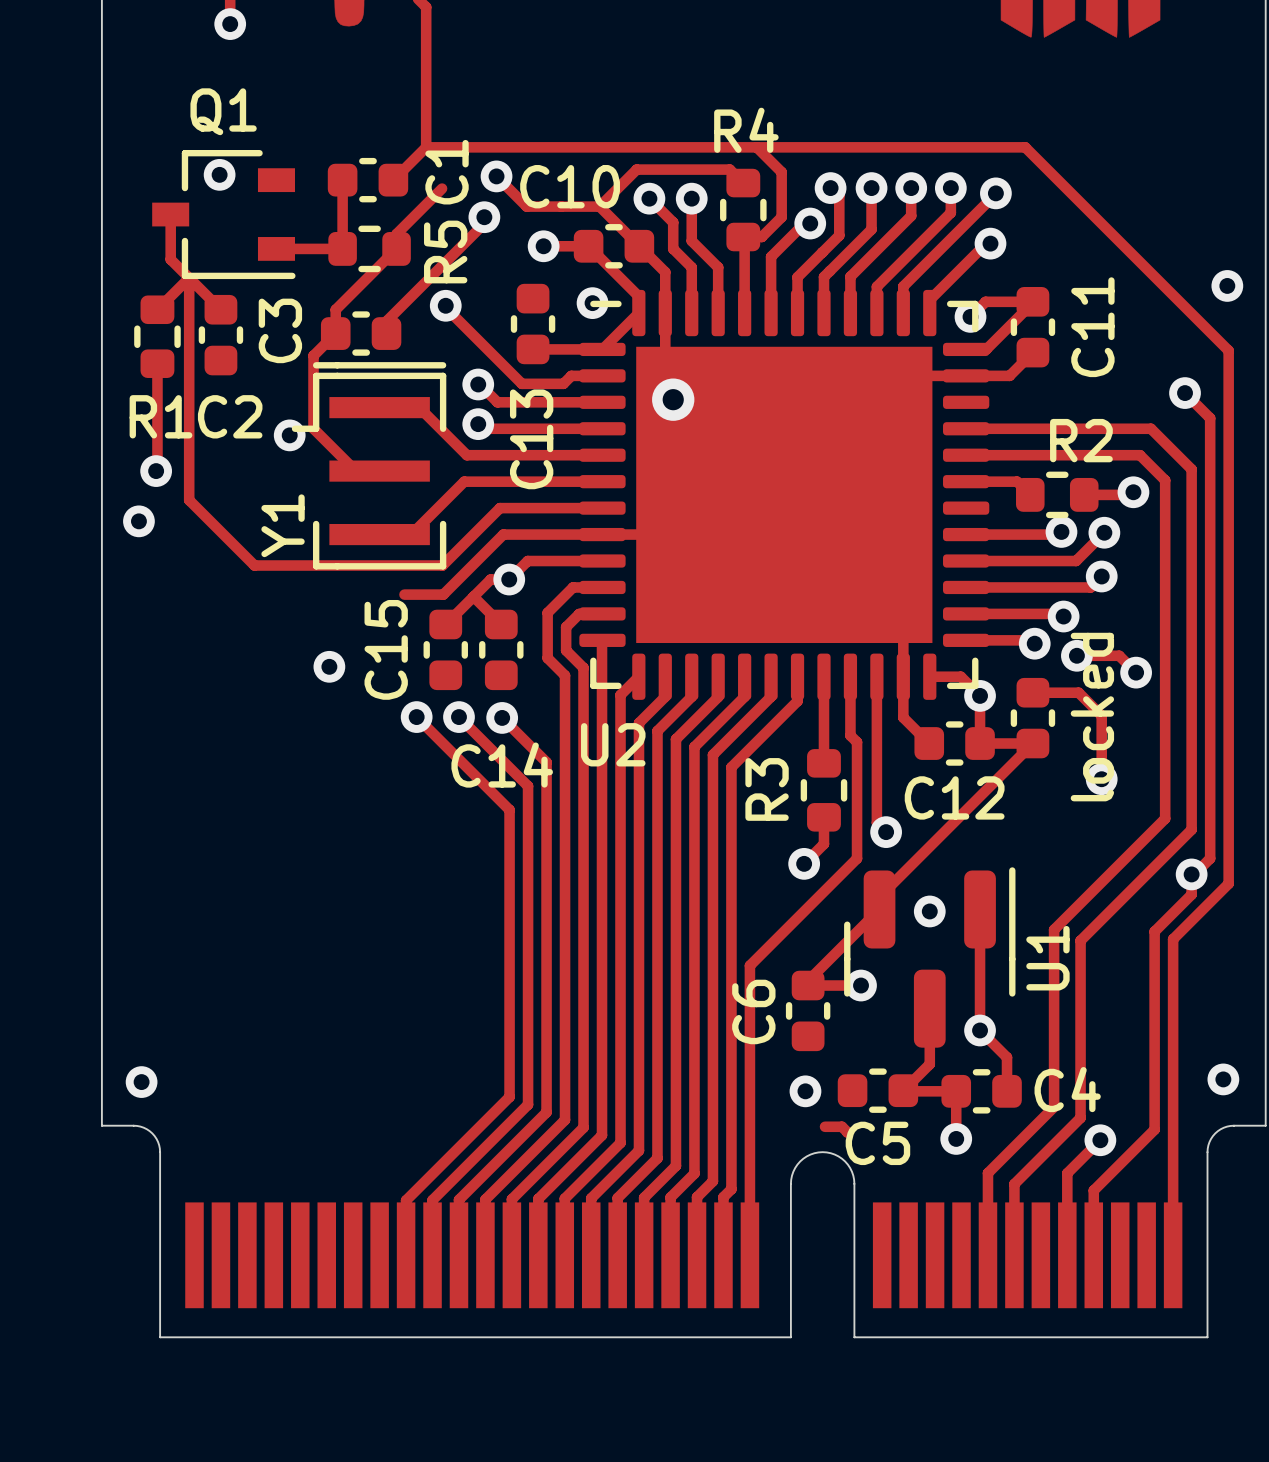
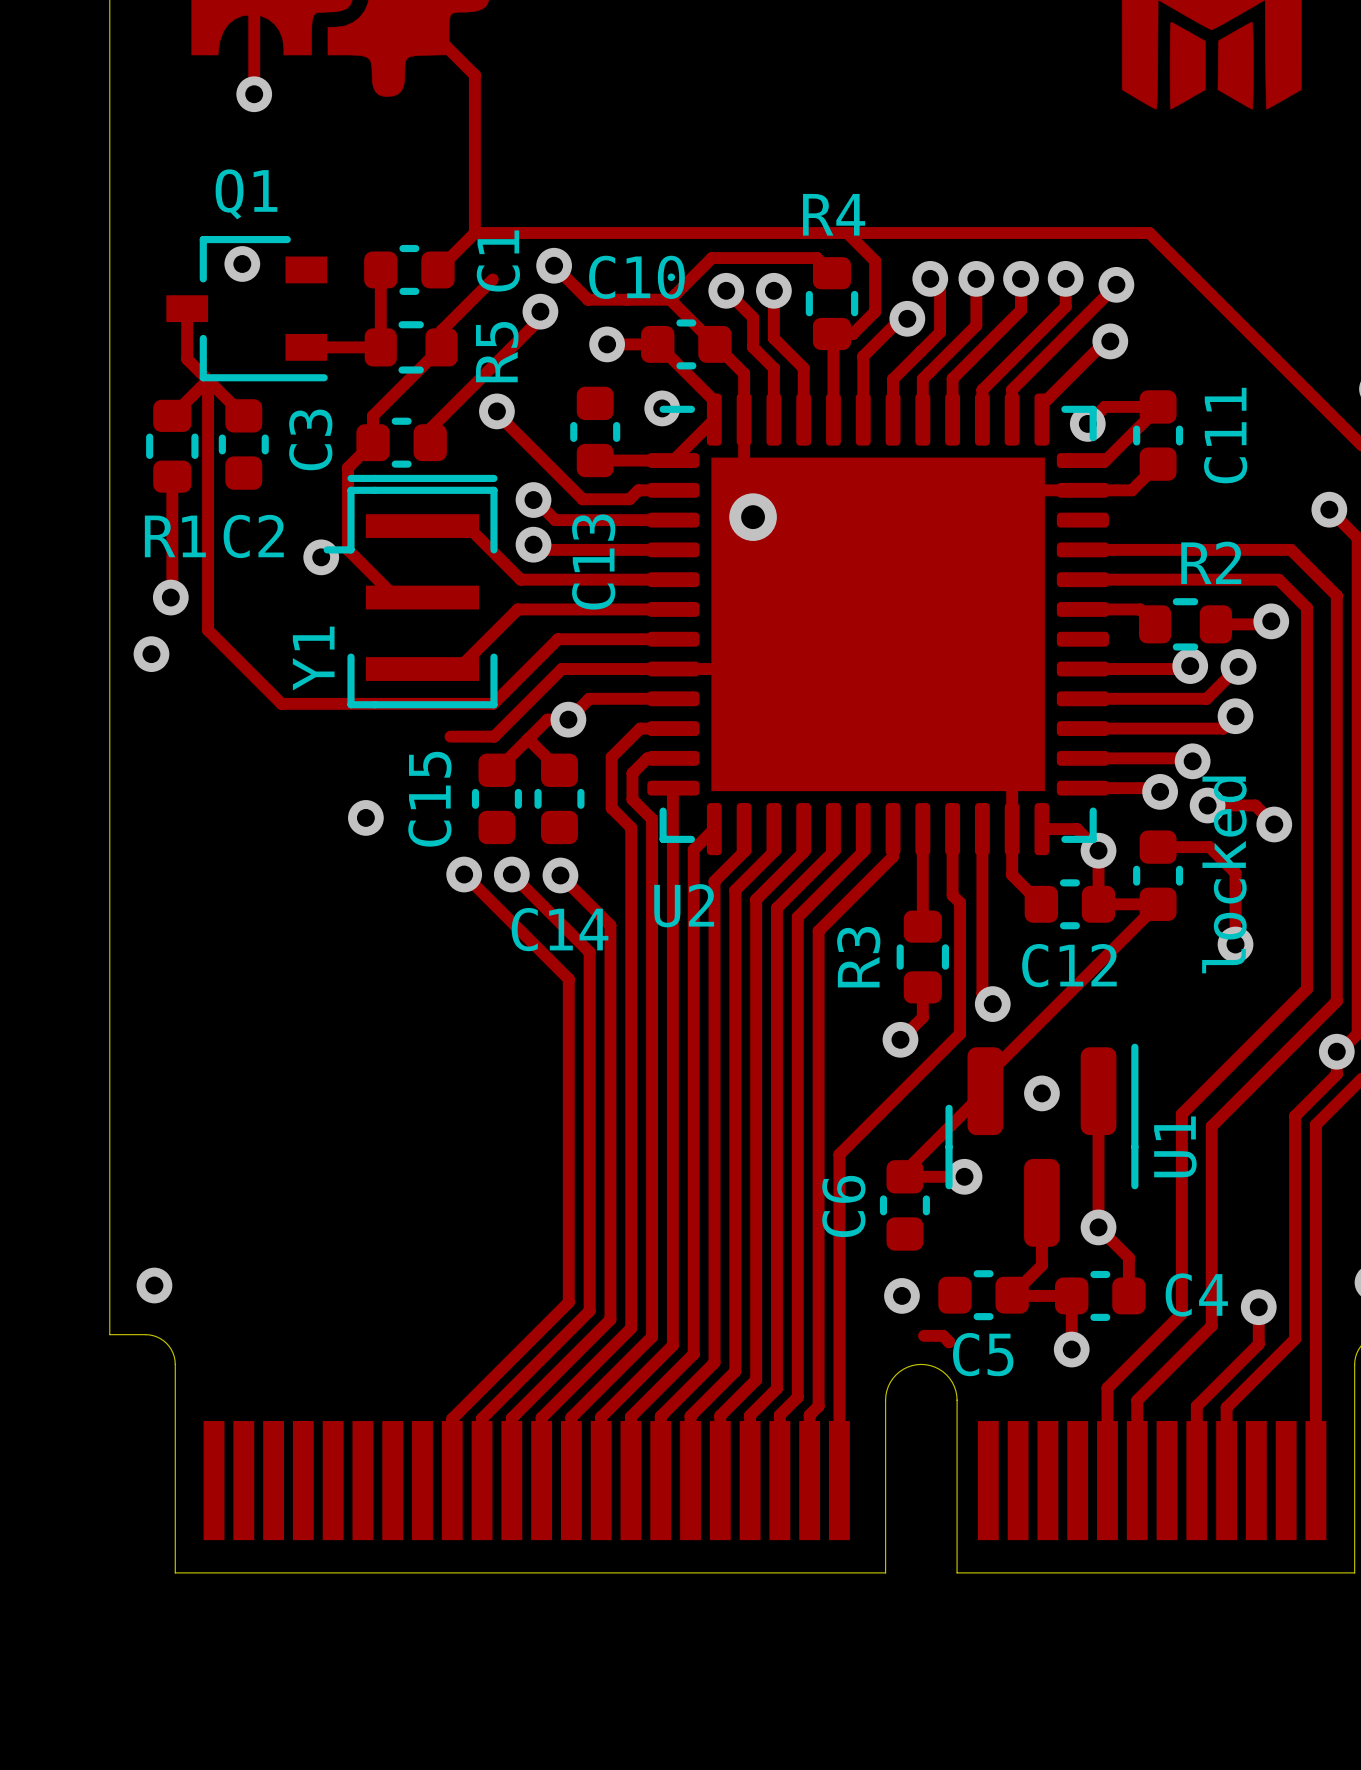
track: (1100, 1140) (1067, 1173) (1067, 1189) -> (1258, 1307) (1258, 1344) (1196, 1406)
via position: (1100, 1140) -> (1258, 1307)

